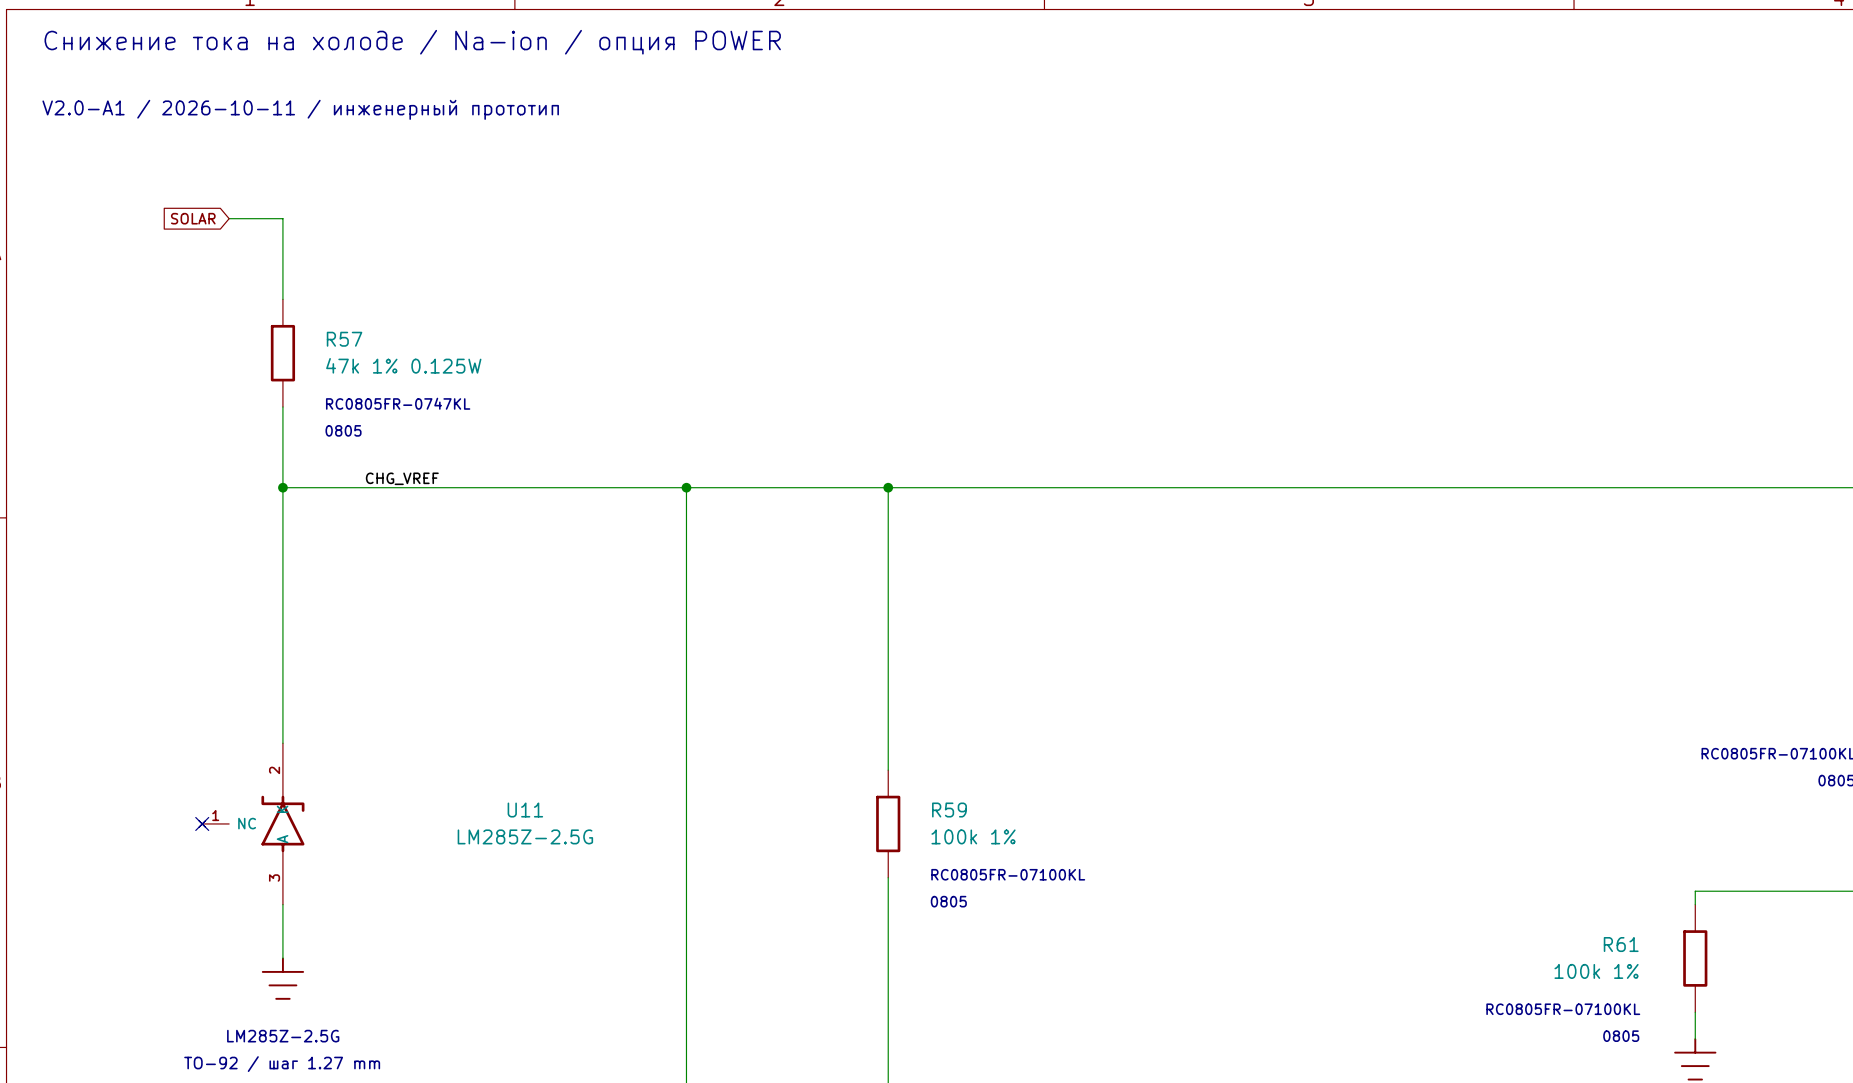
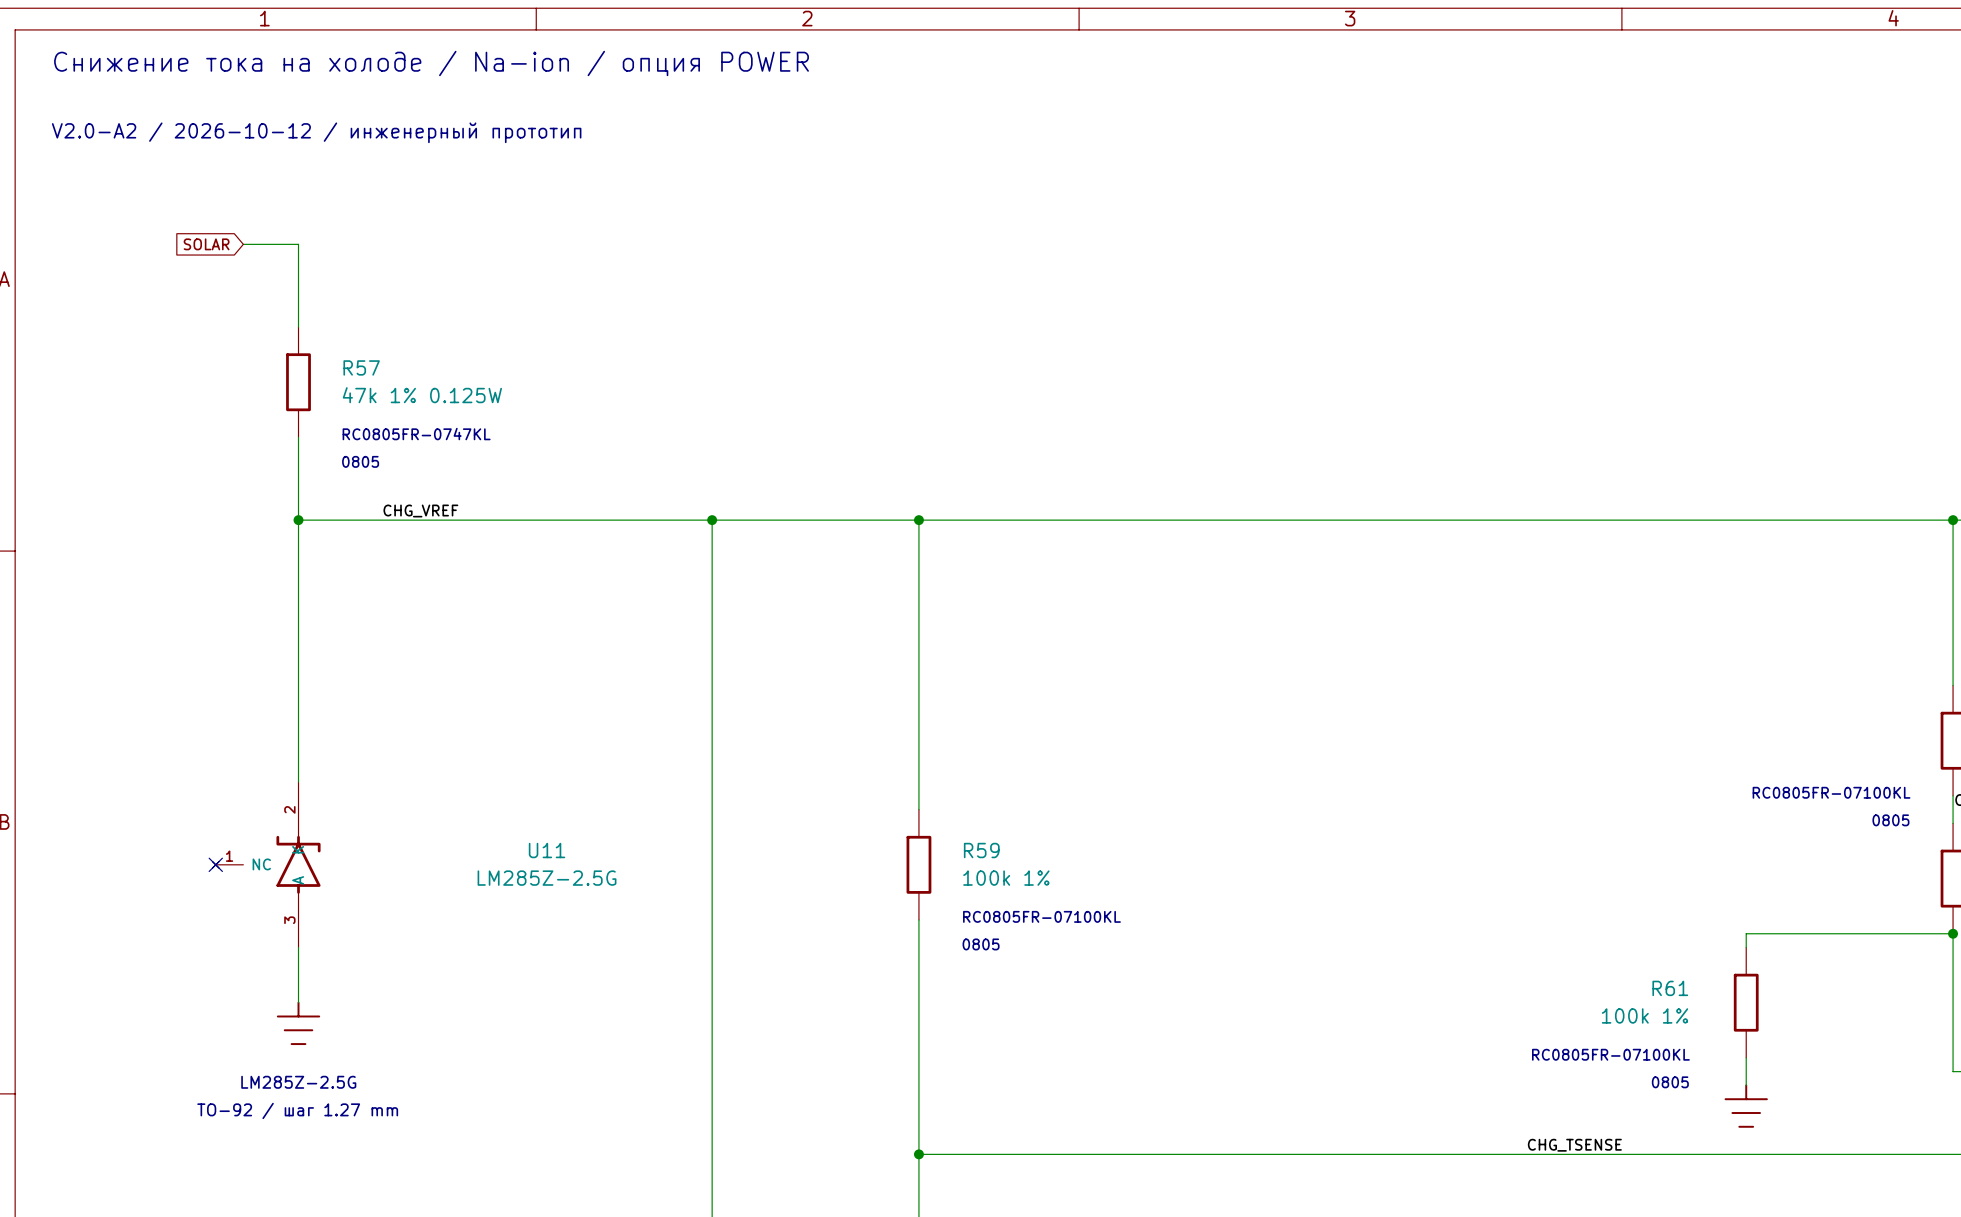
text: V2.0-A1 / 2026-10-11 / инженерный прототип (300, 109) -> V2.0-A2 / 2026-10-12 / инженерный прототип (316, 132)

